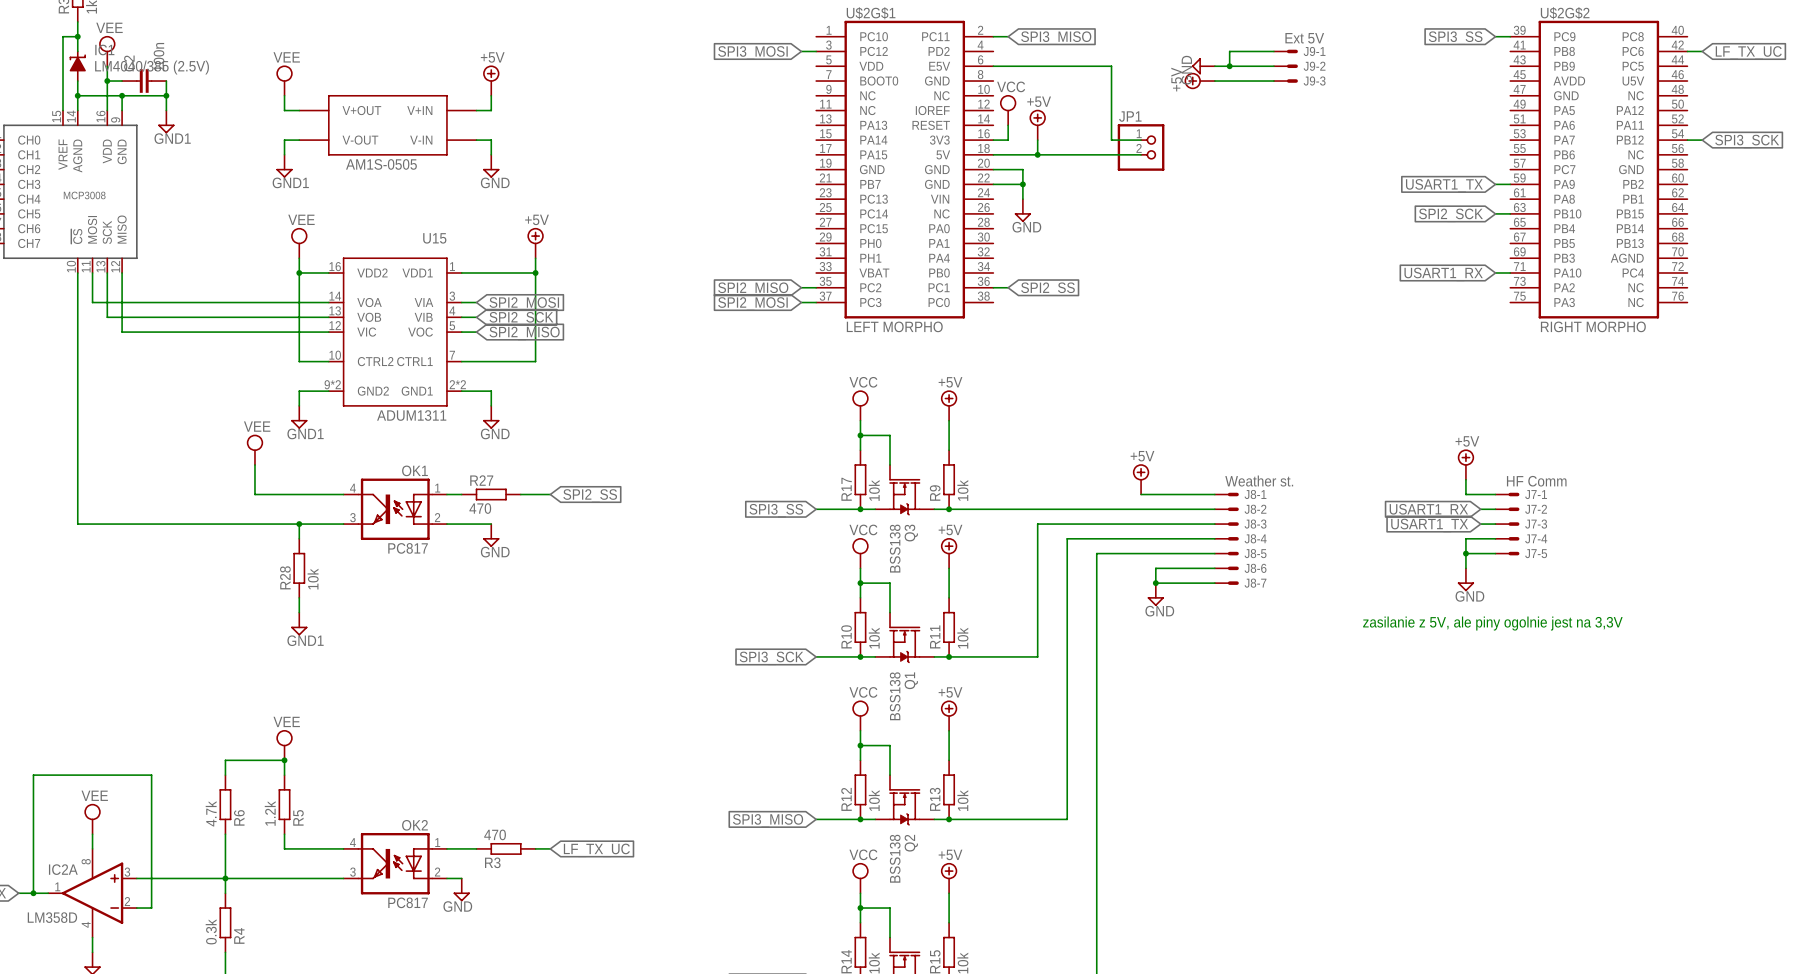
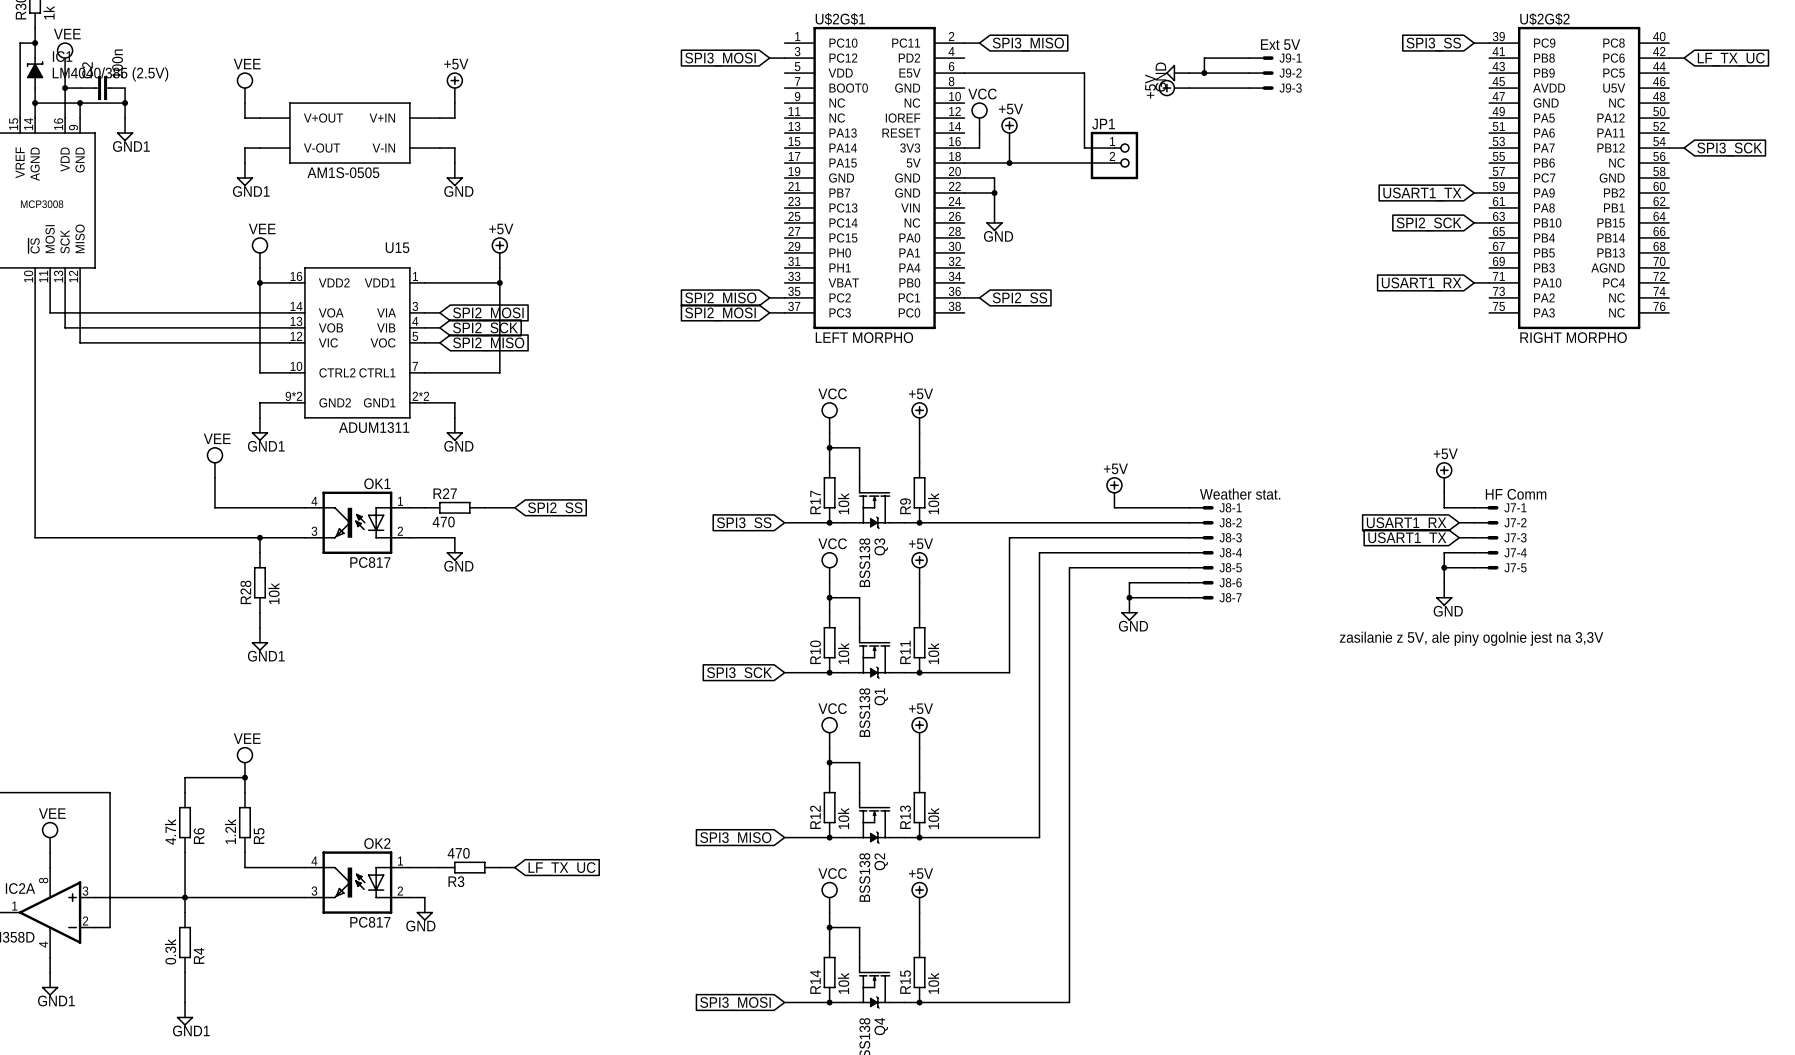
J8-1 value: Weather st. (1259, 481) -> Weather stat. (1240, 494)

